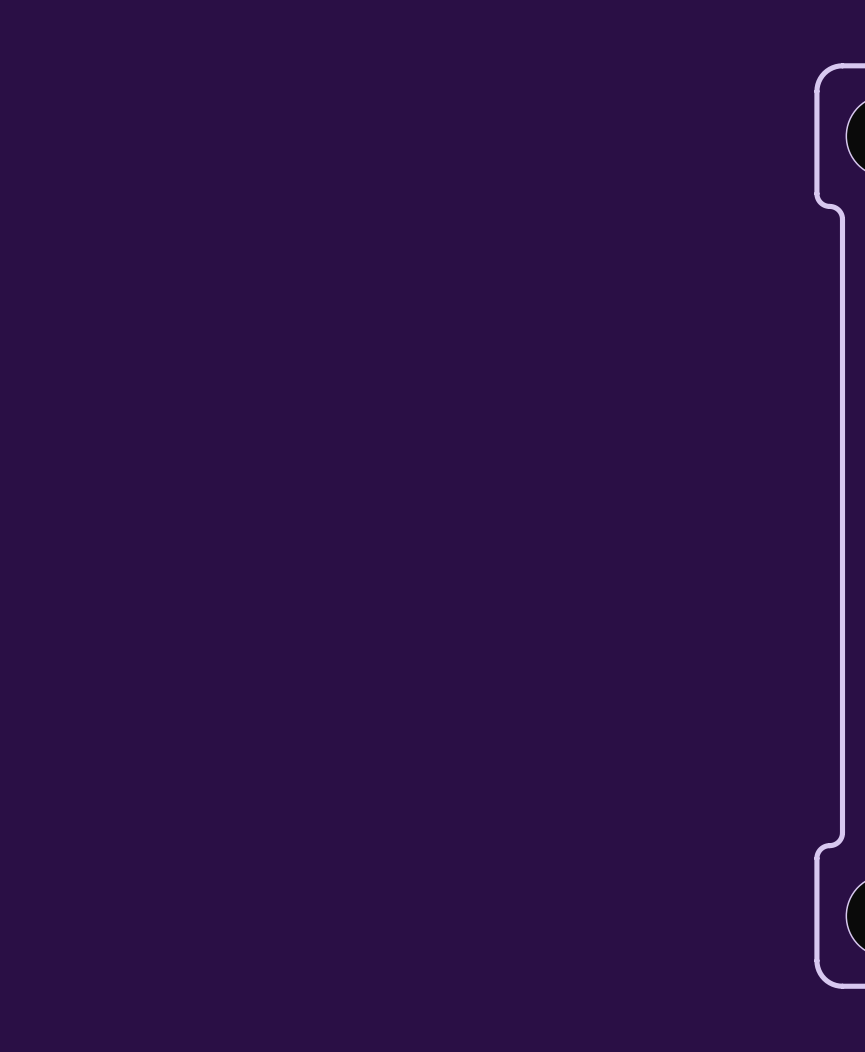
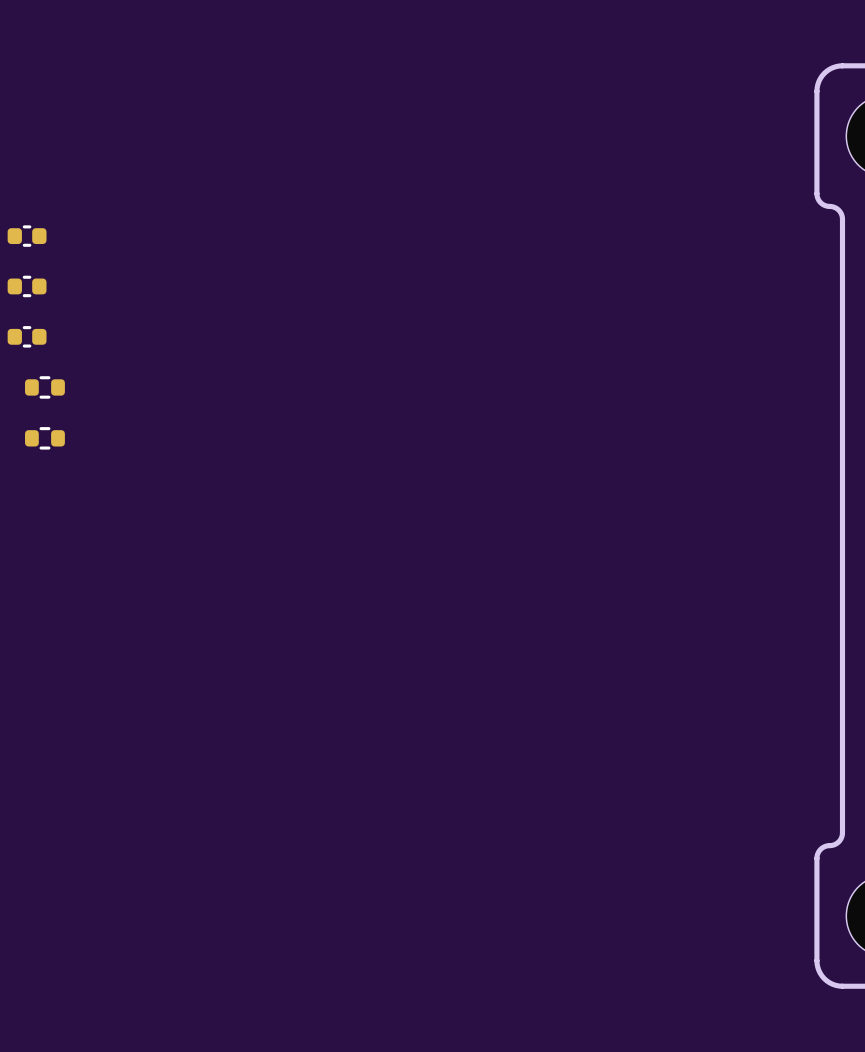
part: none -> (27, 236)
part: none -> (27, 286)
part: none -> (27, 336)
part: none -> (44, 387)
part: none -> (44, 438)

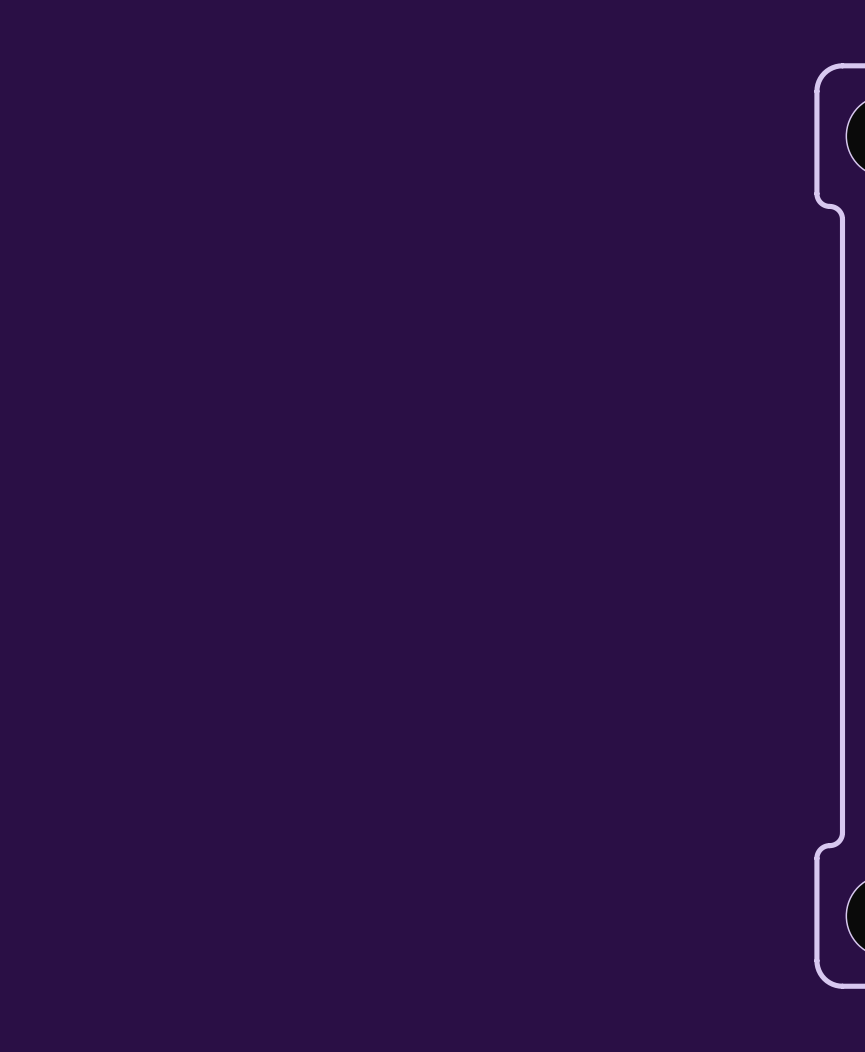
part: (27, 236) -> none
part: (27, 286) -> none
part: (27, 336) -> none
part: (44, 387) -> none
part: (44, 438) -> none

